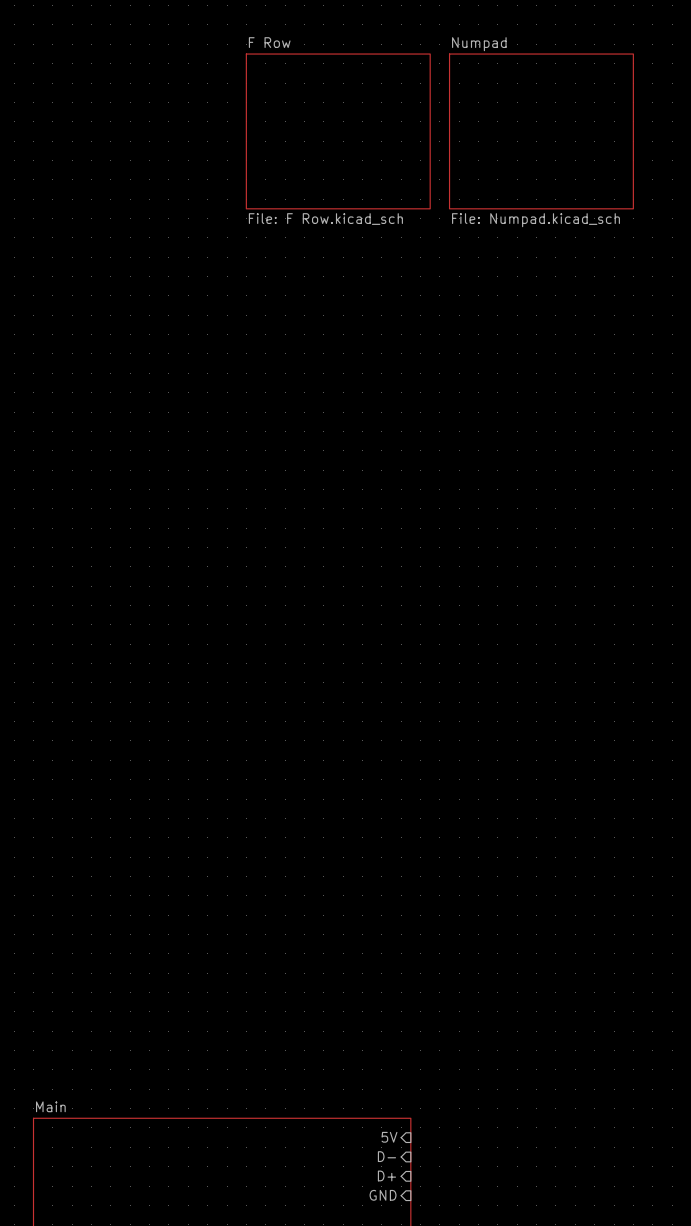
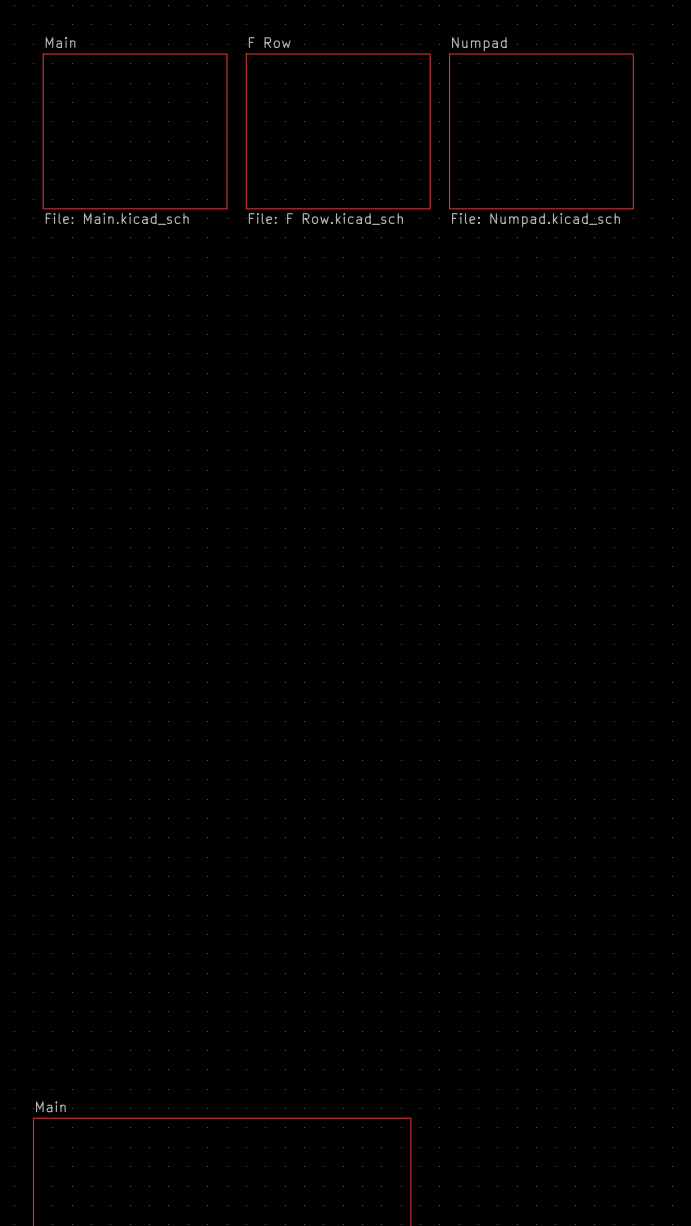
sheet Main: none -> File: Main.kicad_sch (135, 131)
sheet pin: 5V (389, 1137) -> none
sheet pin: D- (386, 1156) -> none
sheet pin: D+ (386, 1175) -> none
sheet pin: GND (383, 1195) -> none

